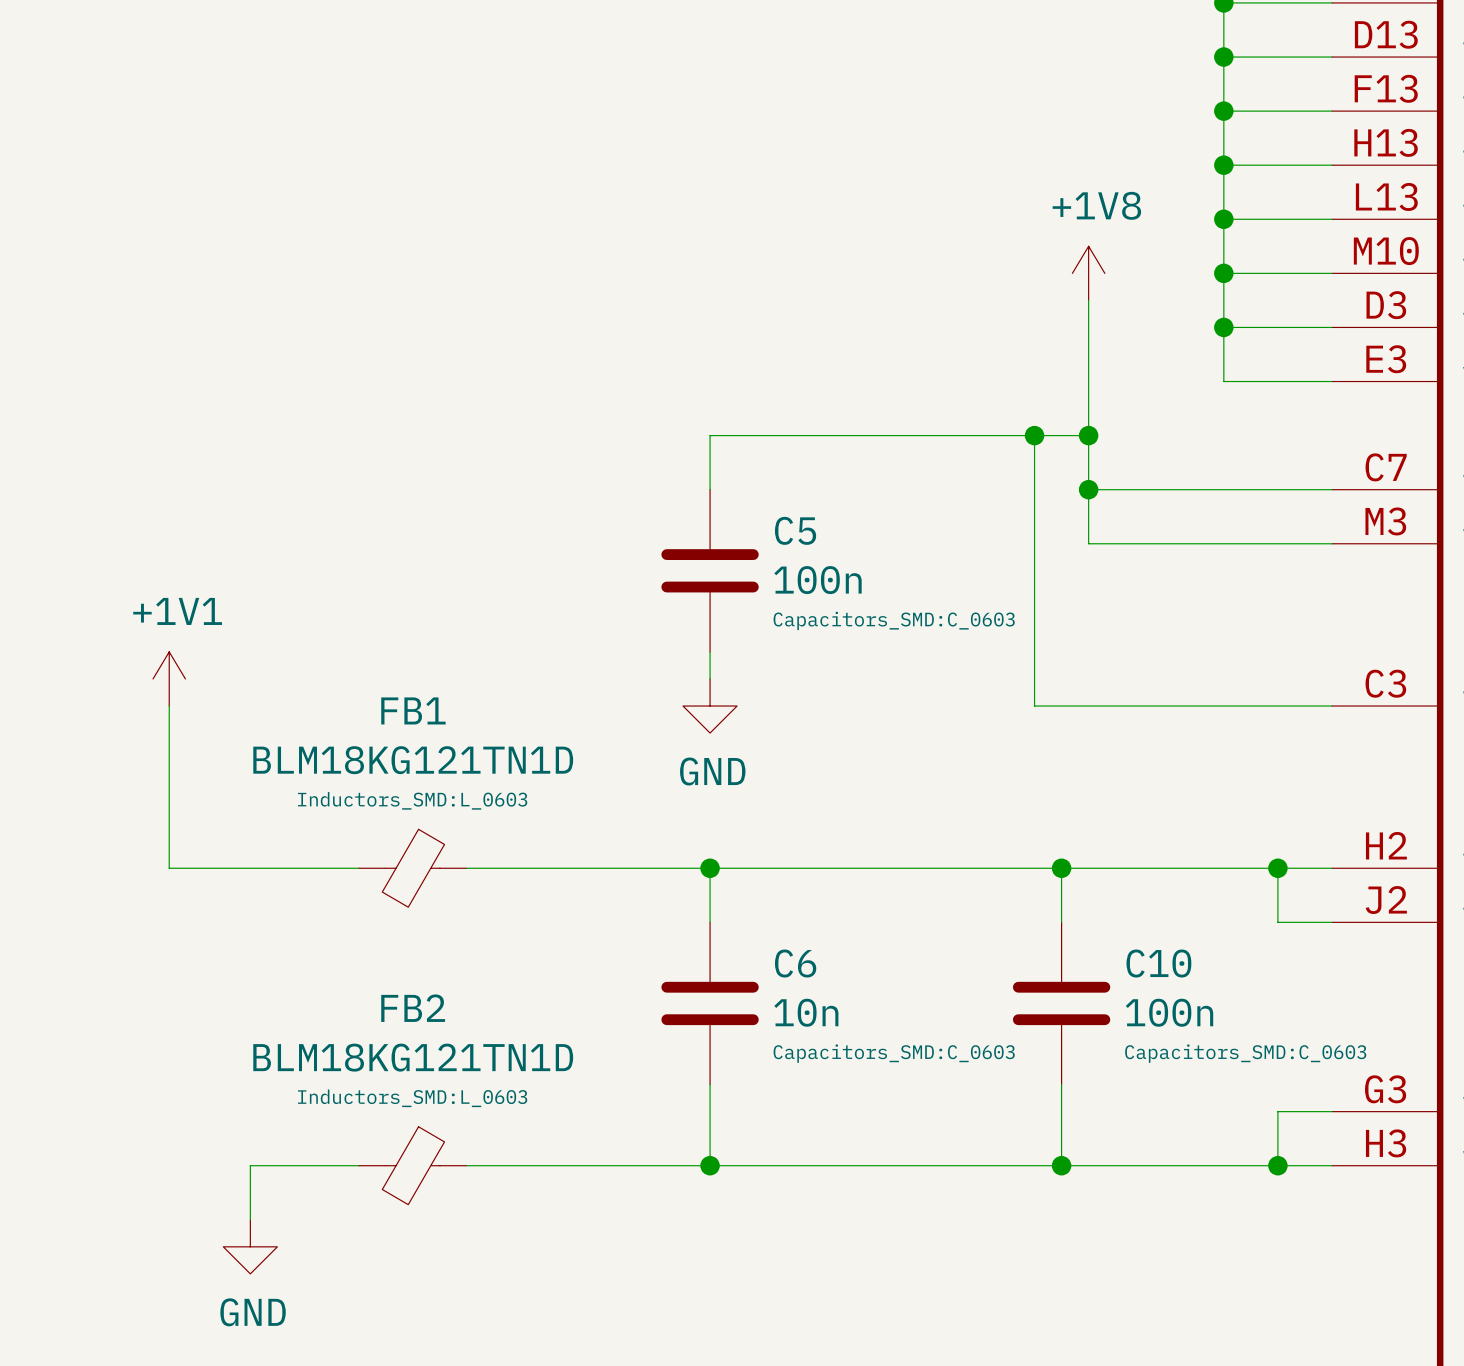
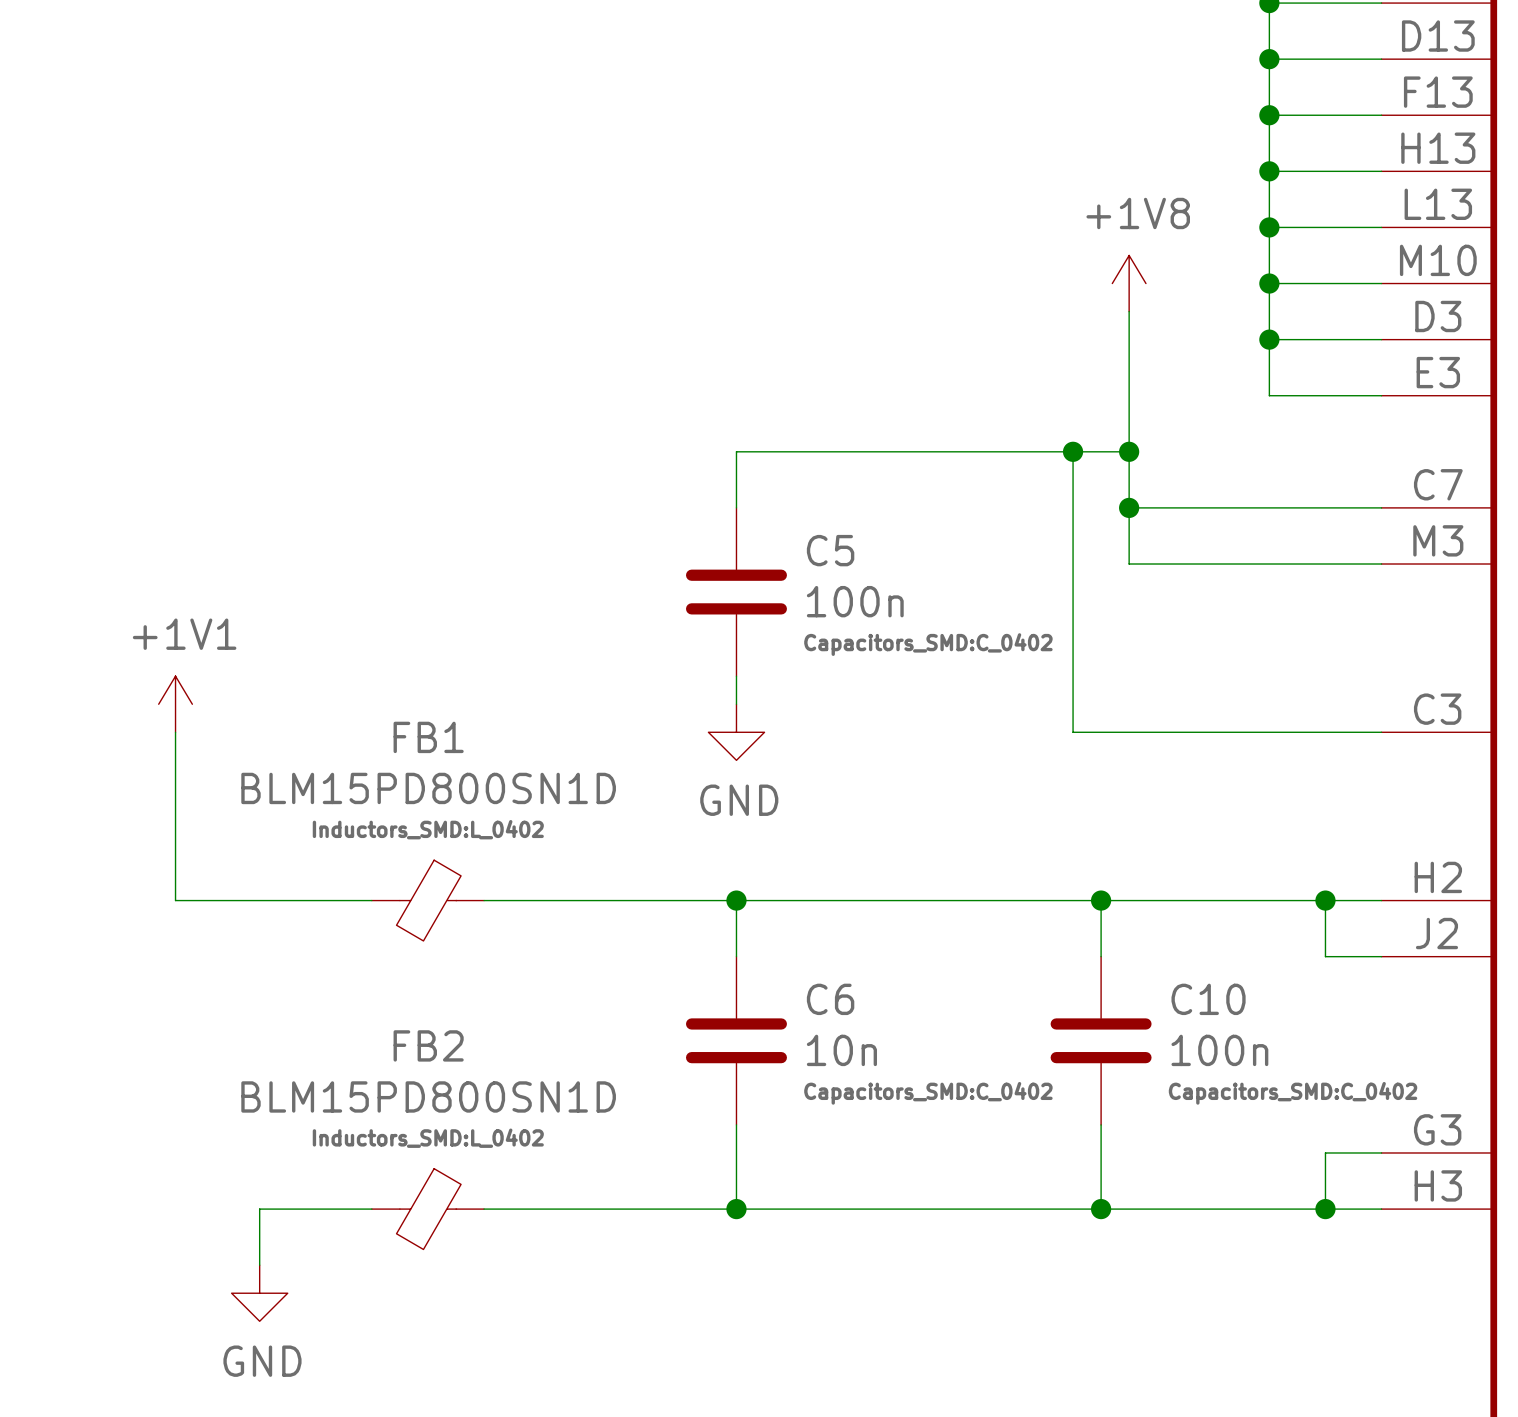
C5 text: Capacitors_SMD:C_0603 (894, 620) -> Capacitors_SMD:C_0402 (928, 644)
FB1 value: BLM18KG121TN1D (413, 760) -> BLM15PD800SN1D (428, 788)
FB1 text: Inductors_SMD:L_0603 (412, 800) -> Inductors_SMD:L_0402 (428, 829)
C6 text: Capacitors_SMD:C_0603 (894, 1053) -> Capacitors_SMD:C_0402 (928, 1093)
C10 text: Capacitors_SMD:C_0603 (1245, 1053) -> Capacitors_SMD:C_0402 (1293, 1093)
FB2 value: BLM18KG121TN1D (413, 1057) -> BLM15PD800SN1D (428, 1096)
FB2 text: Inductors_SMD:L_0603 (412, 1098) -> Inductors_SMD:L_0402 (428, 1138)

